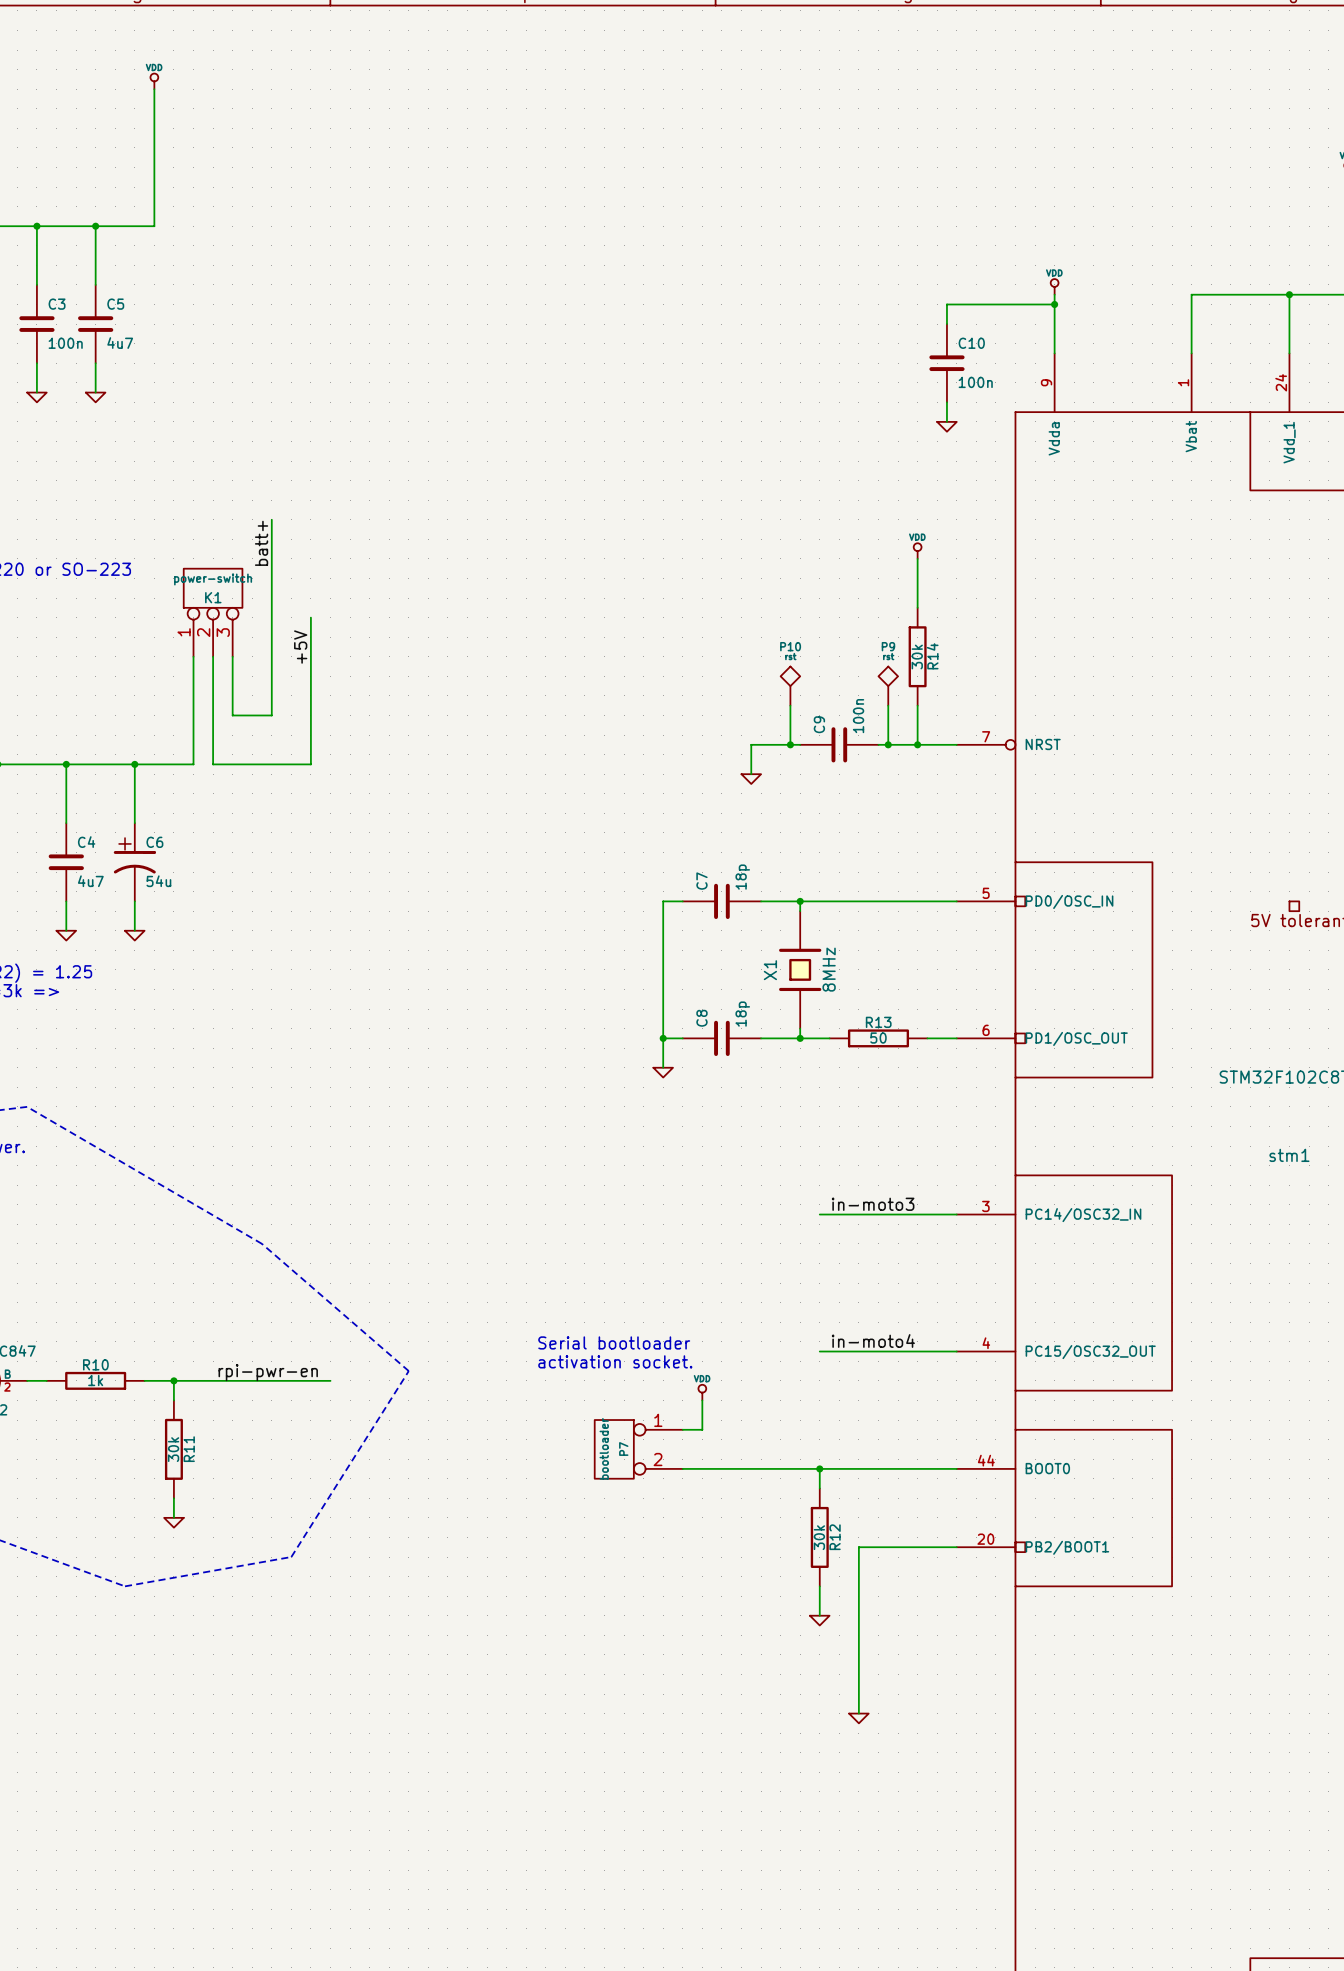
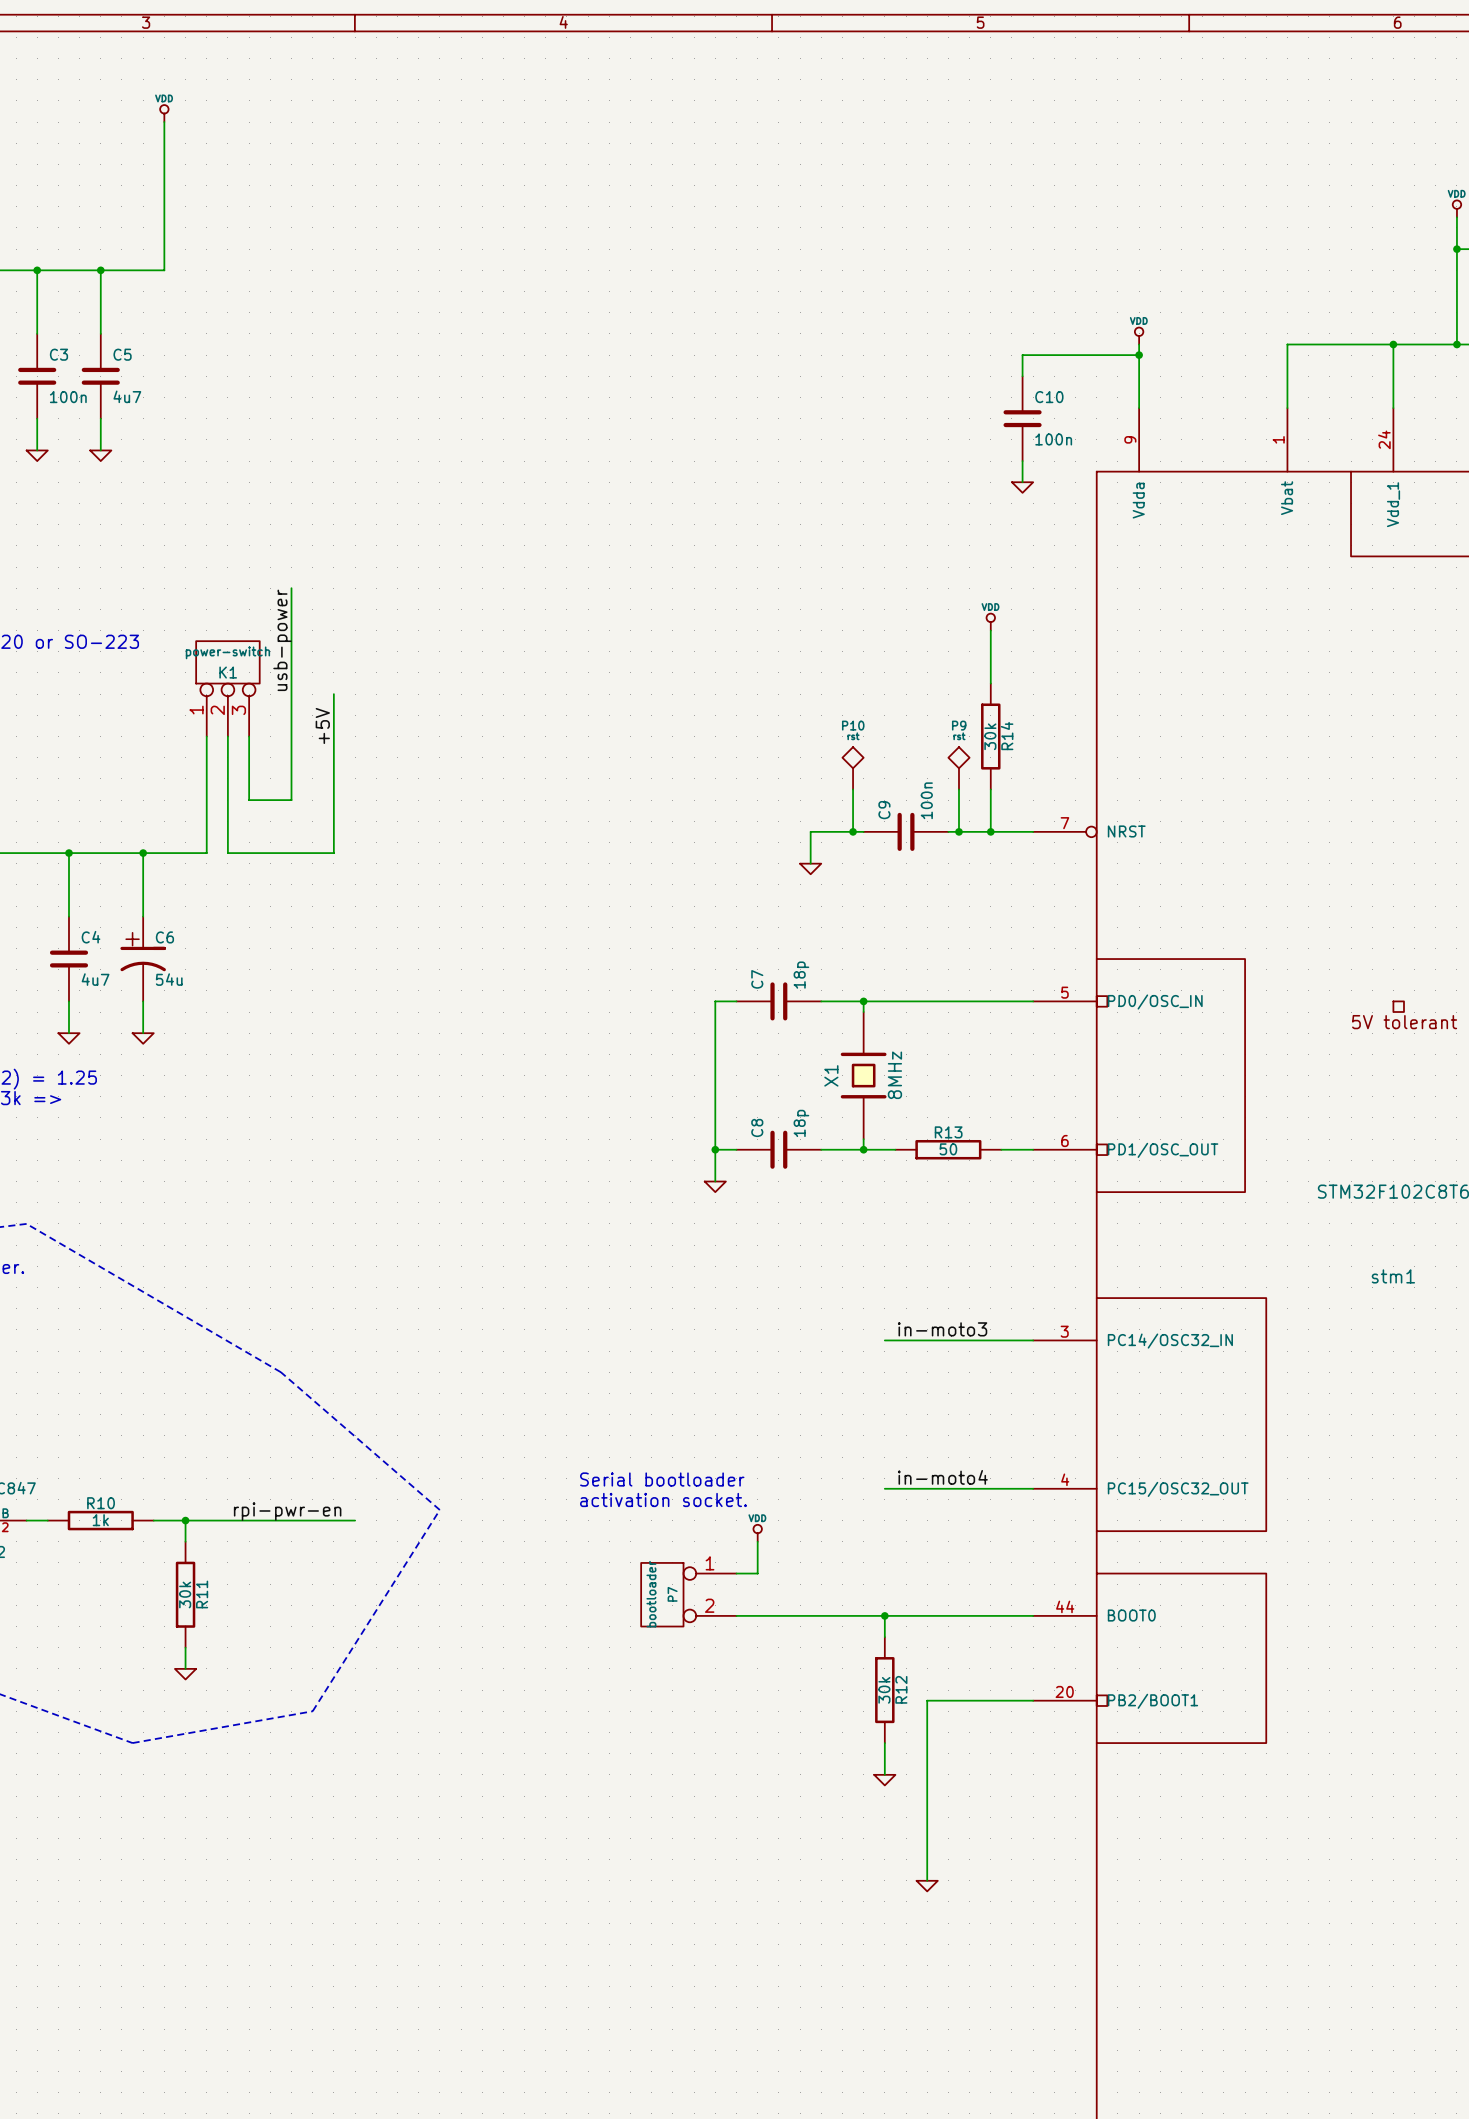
label: batt+ (261, 543) -> none
label: none -> usb-power (282, 640)

